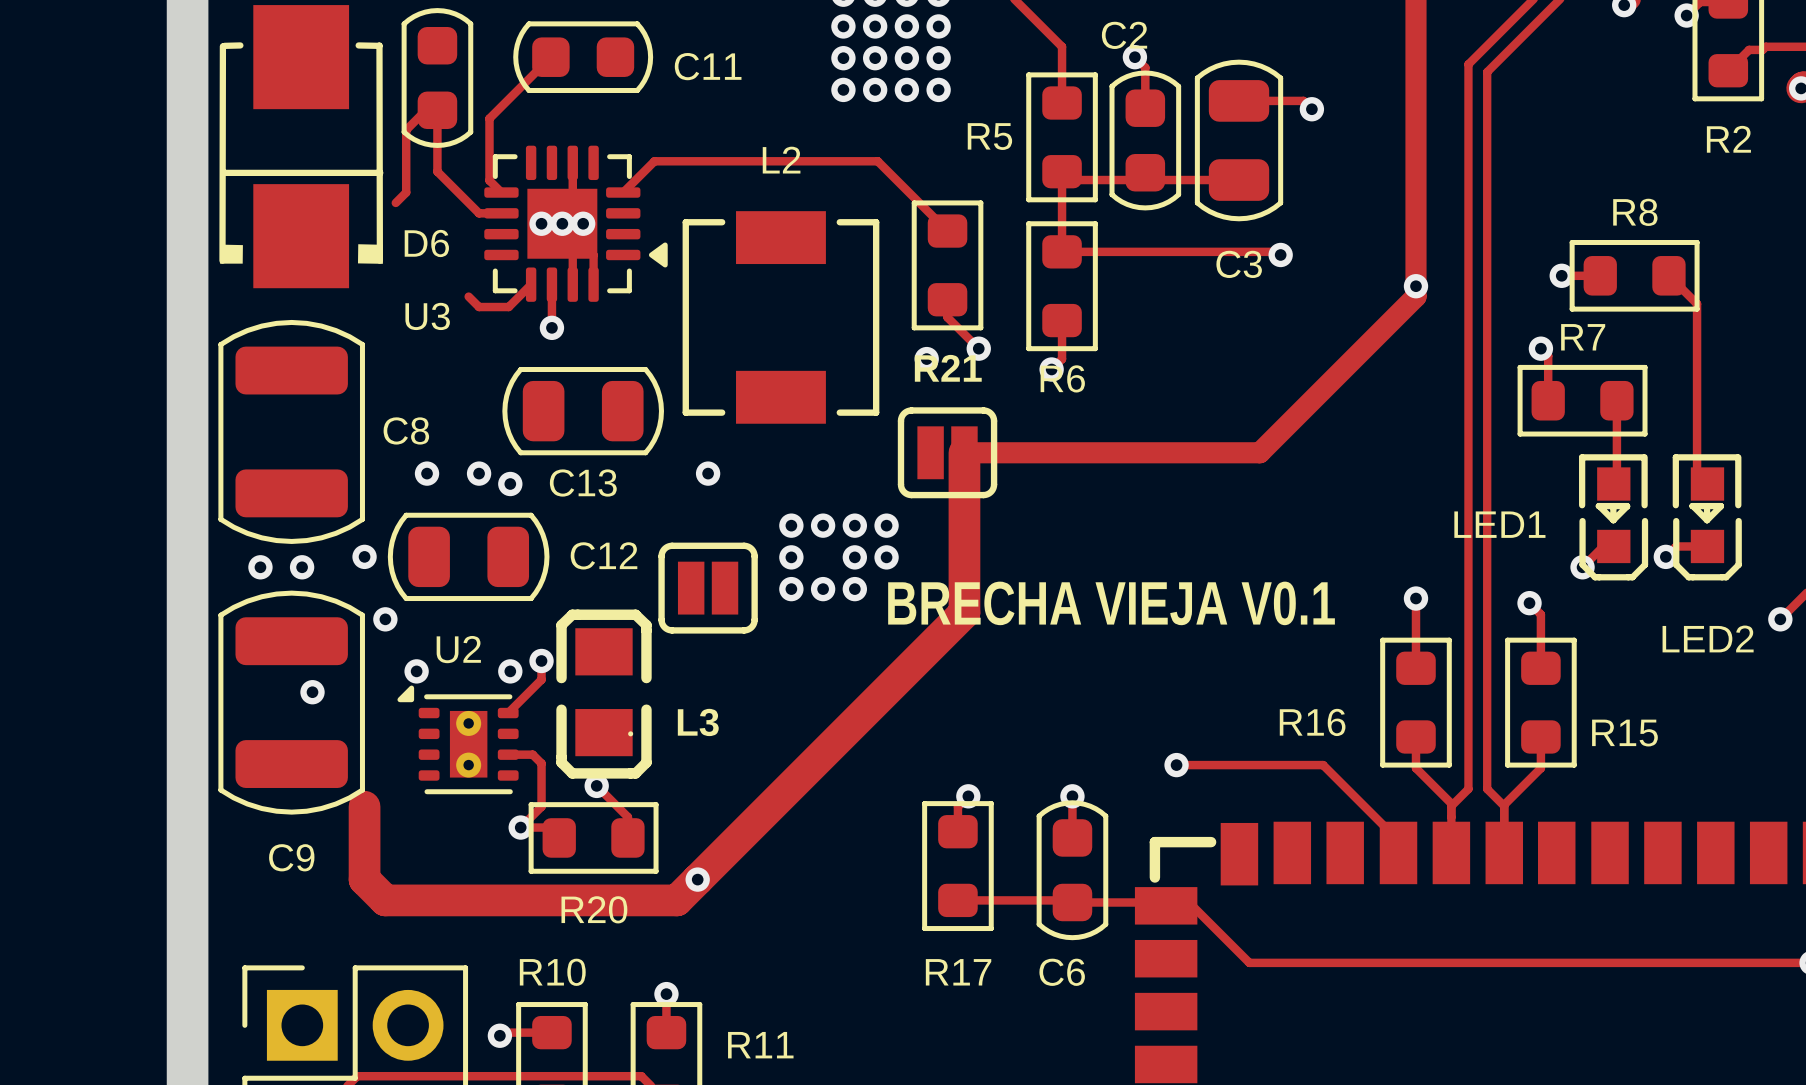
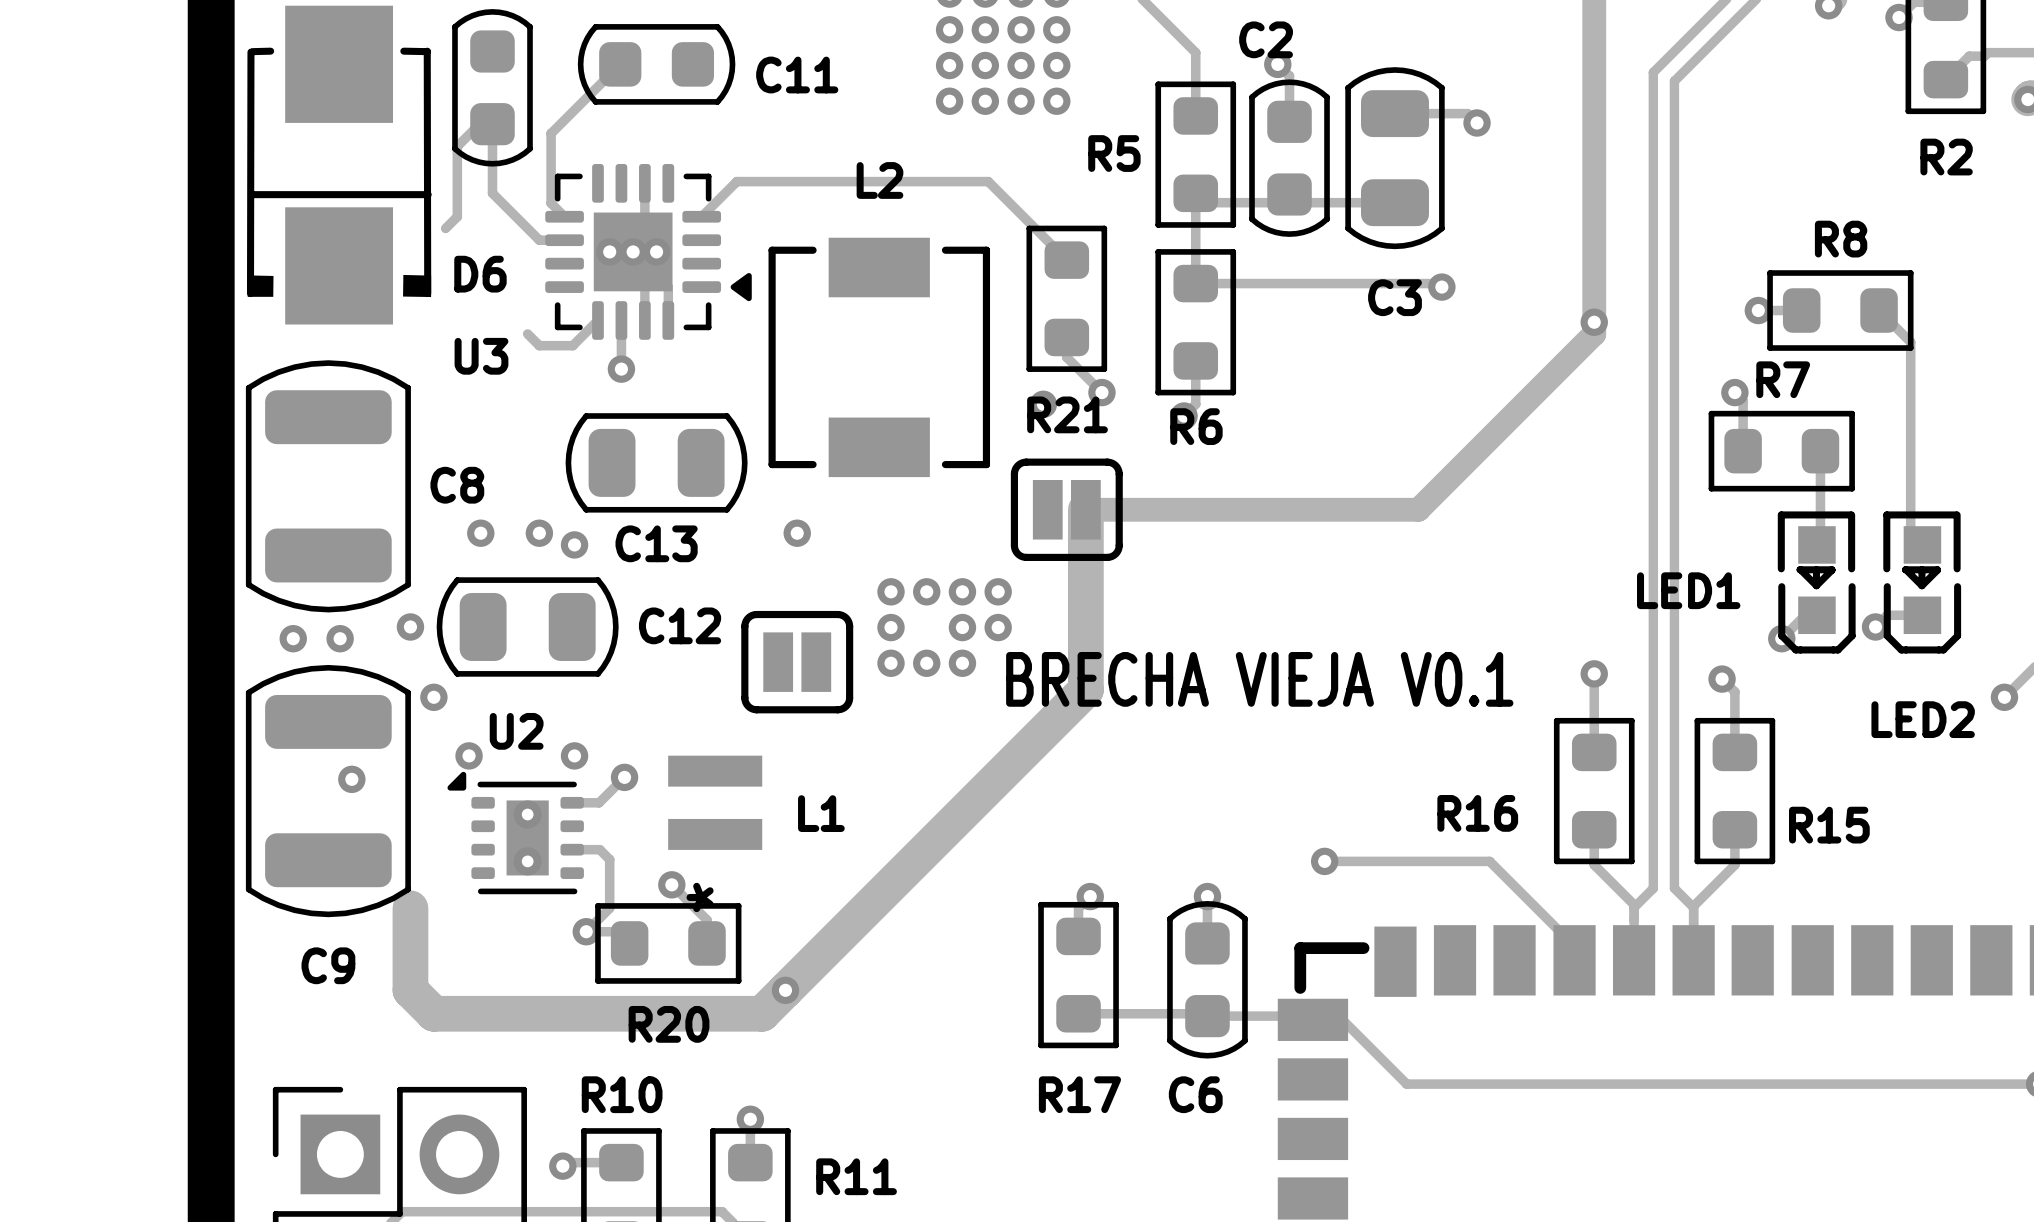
track: (541, 660) (541, 679) (508, 713) -> (624, 777) (599, 802) (572, 802)
via position: (541, 660) -> (624, 777)
L3: (603, 694) -> none
L1: none -> (715, 802)

